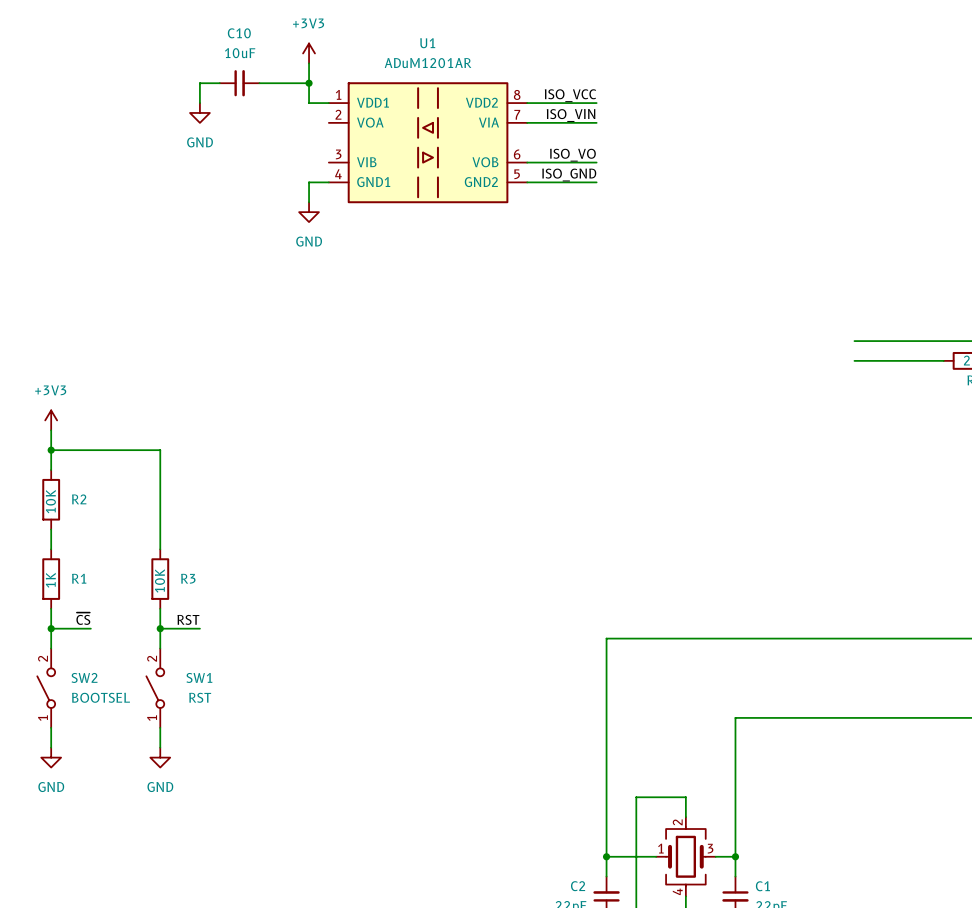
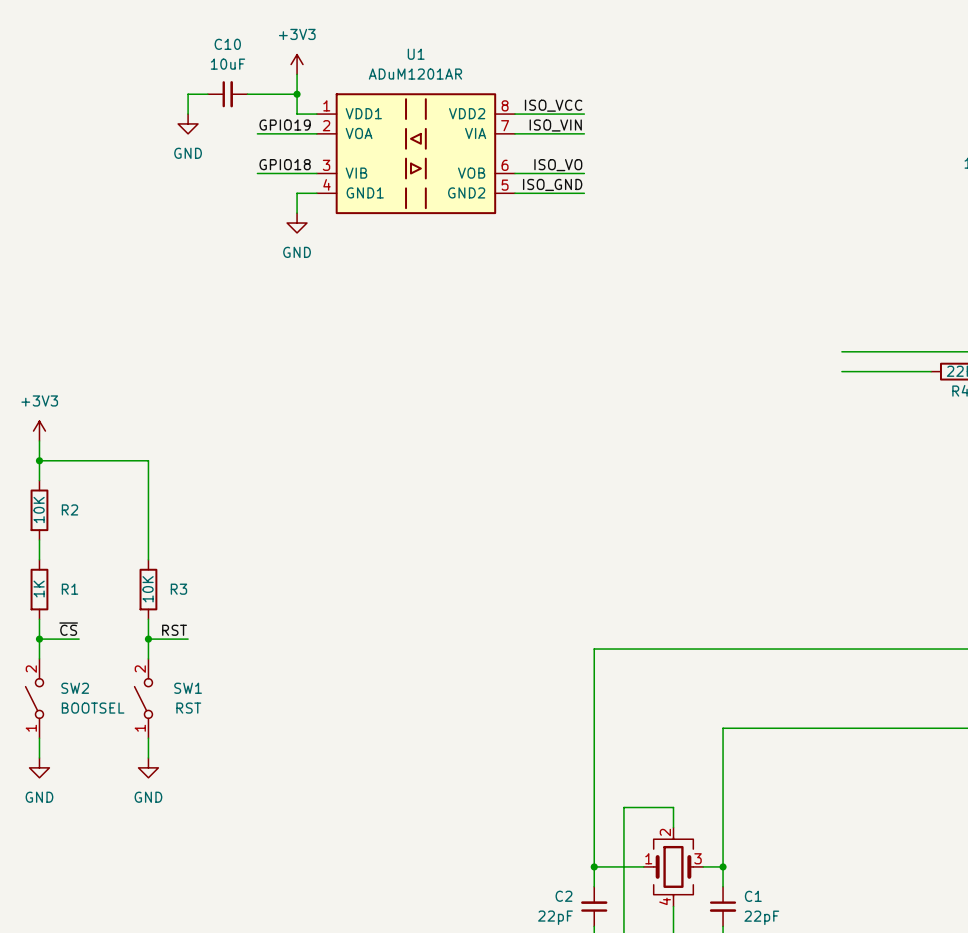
label: none -> GPIO19 (285, 125)
wire: none -> (257, 133) (316, 133)
label: none -> GPIO18 (285, 164)
wire: none -> (257, 173) (316, 173)

